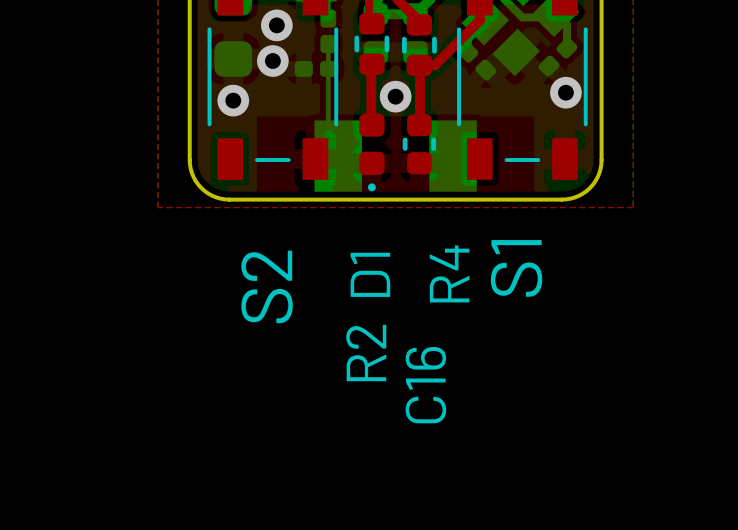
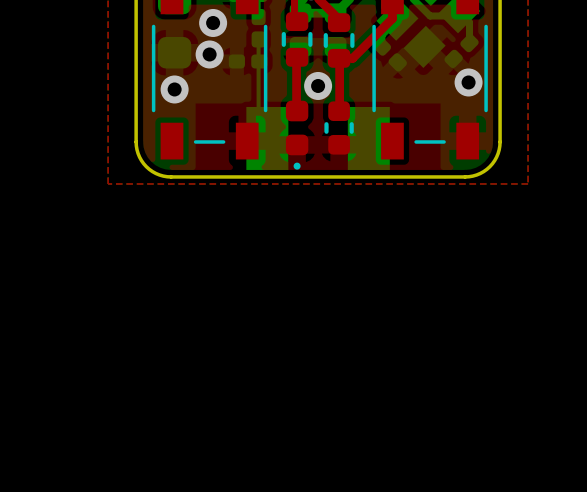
S1 name: S1 (516, 268) -> none
R4 name: R4 (449, 273) -> none
D1 name: D1 (370, 274) -> none
S2 name: S2 (267, 286) -> none
R2 name: R2 (366, 353) -> none
C16 name: C16 (425, 385) -> none

